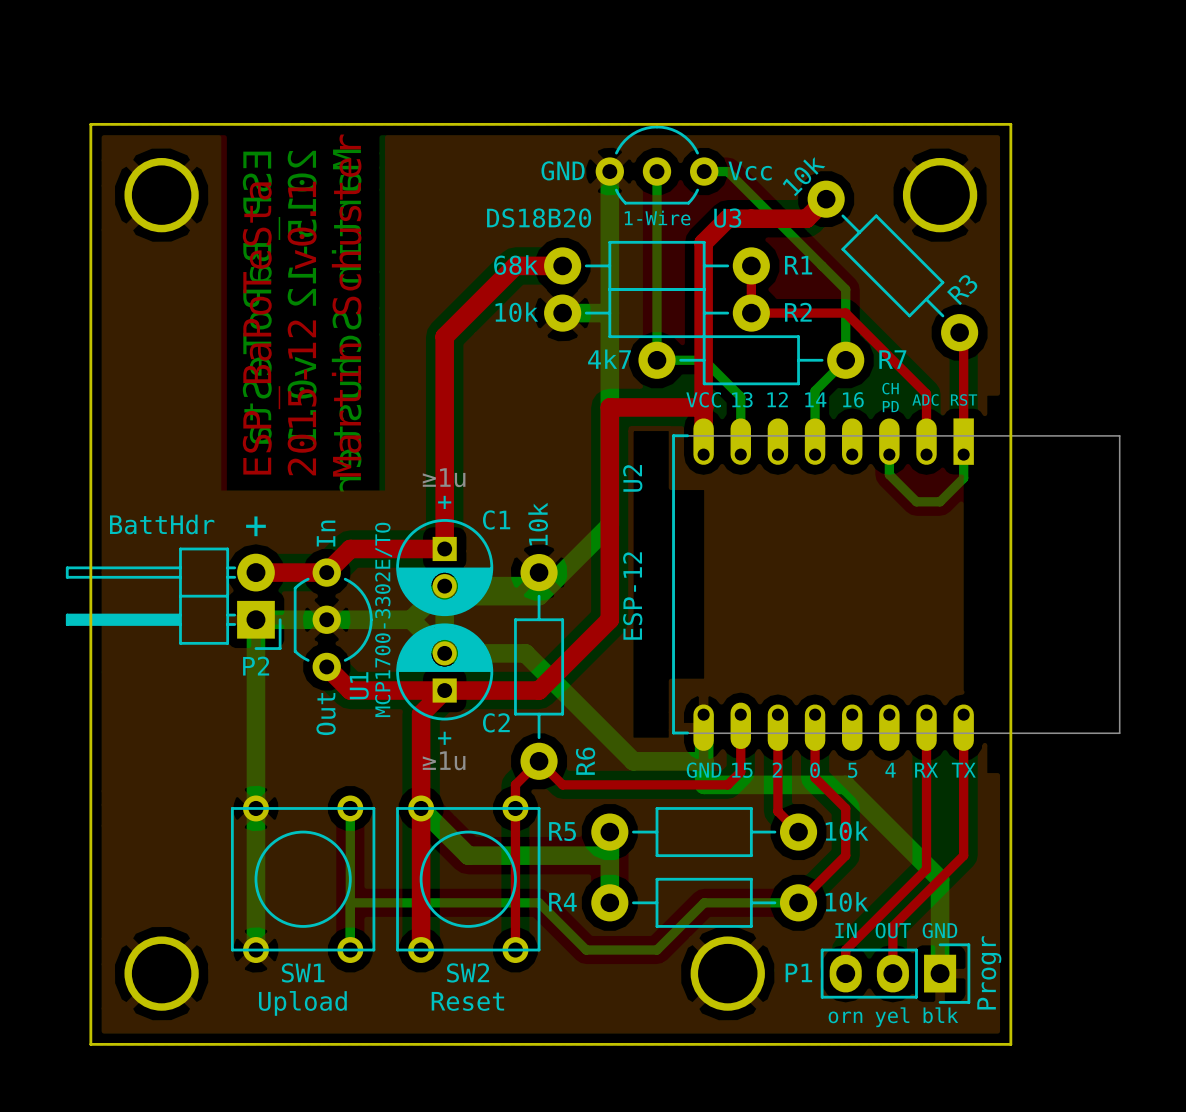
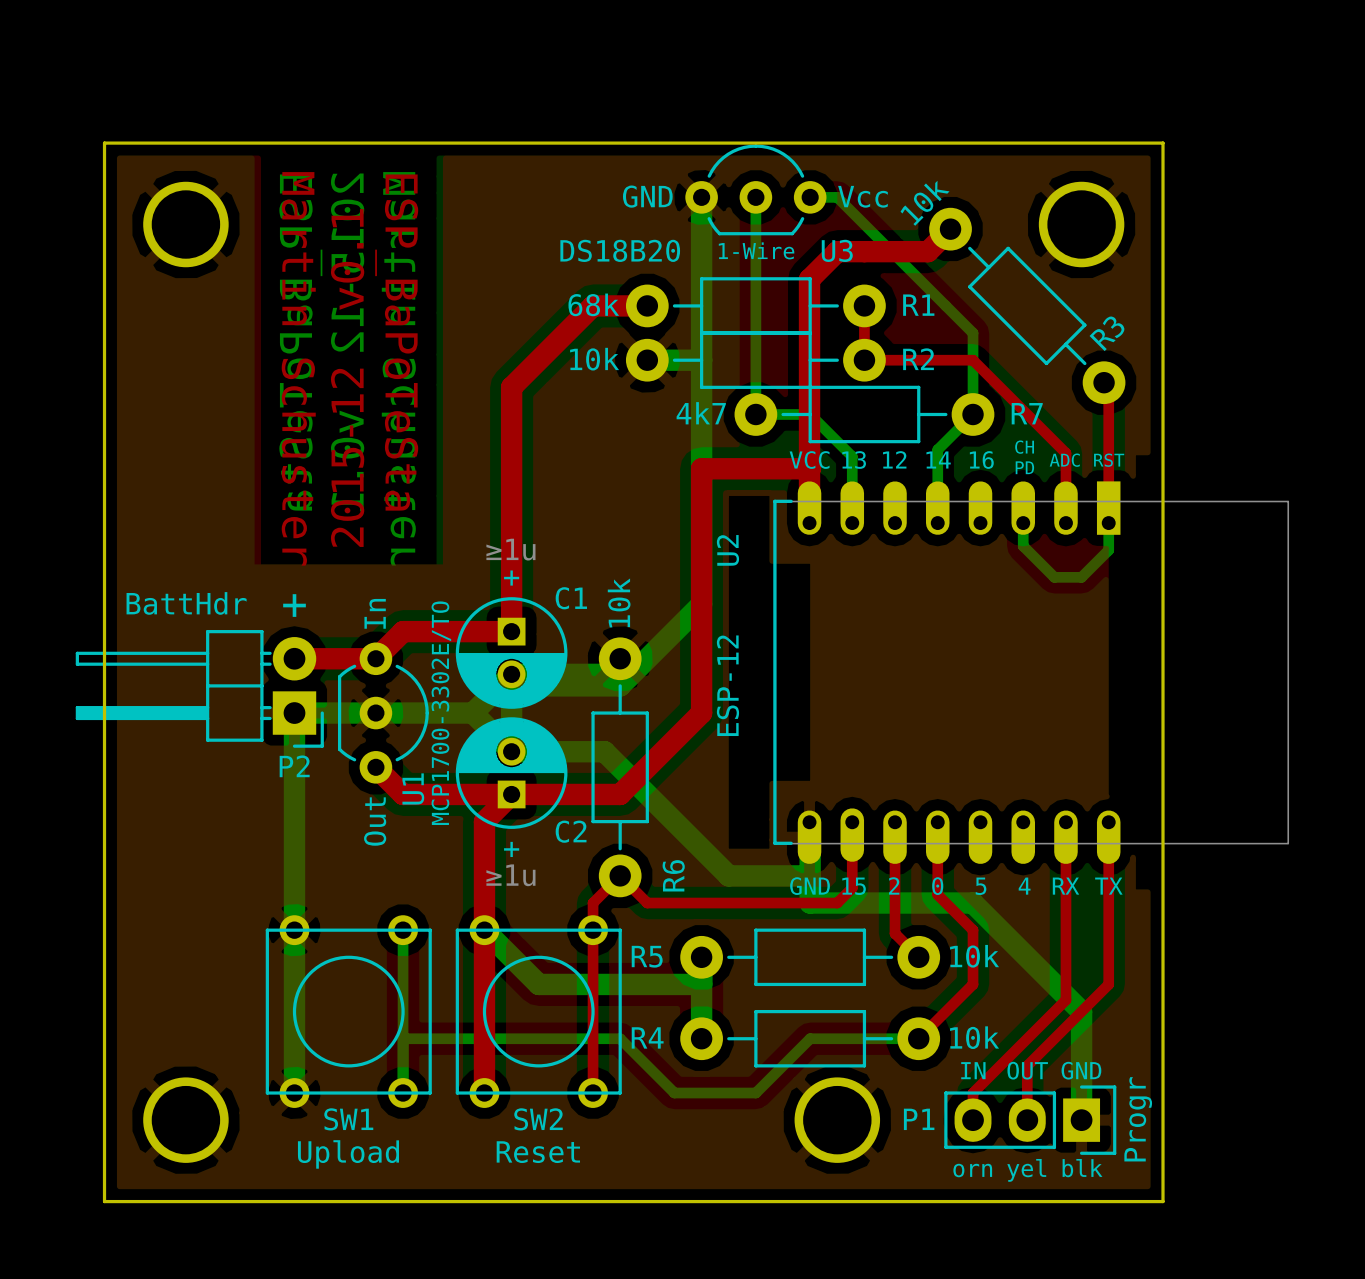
text rotation: 0° (346, 305) -> 180° (298, 368)
text rotation: 0° (261, 328) -> 180° (396, 342)

